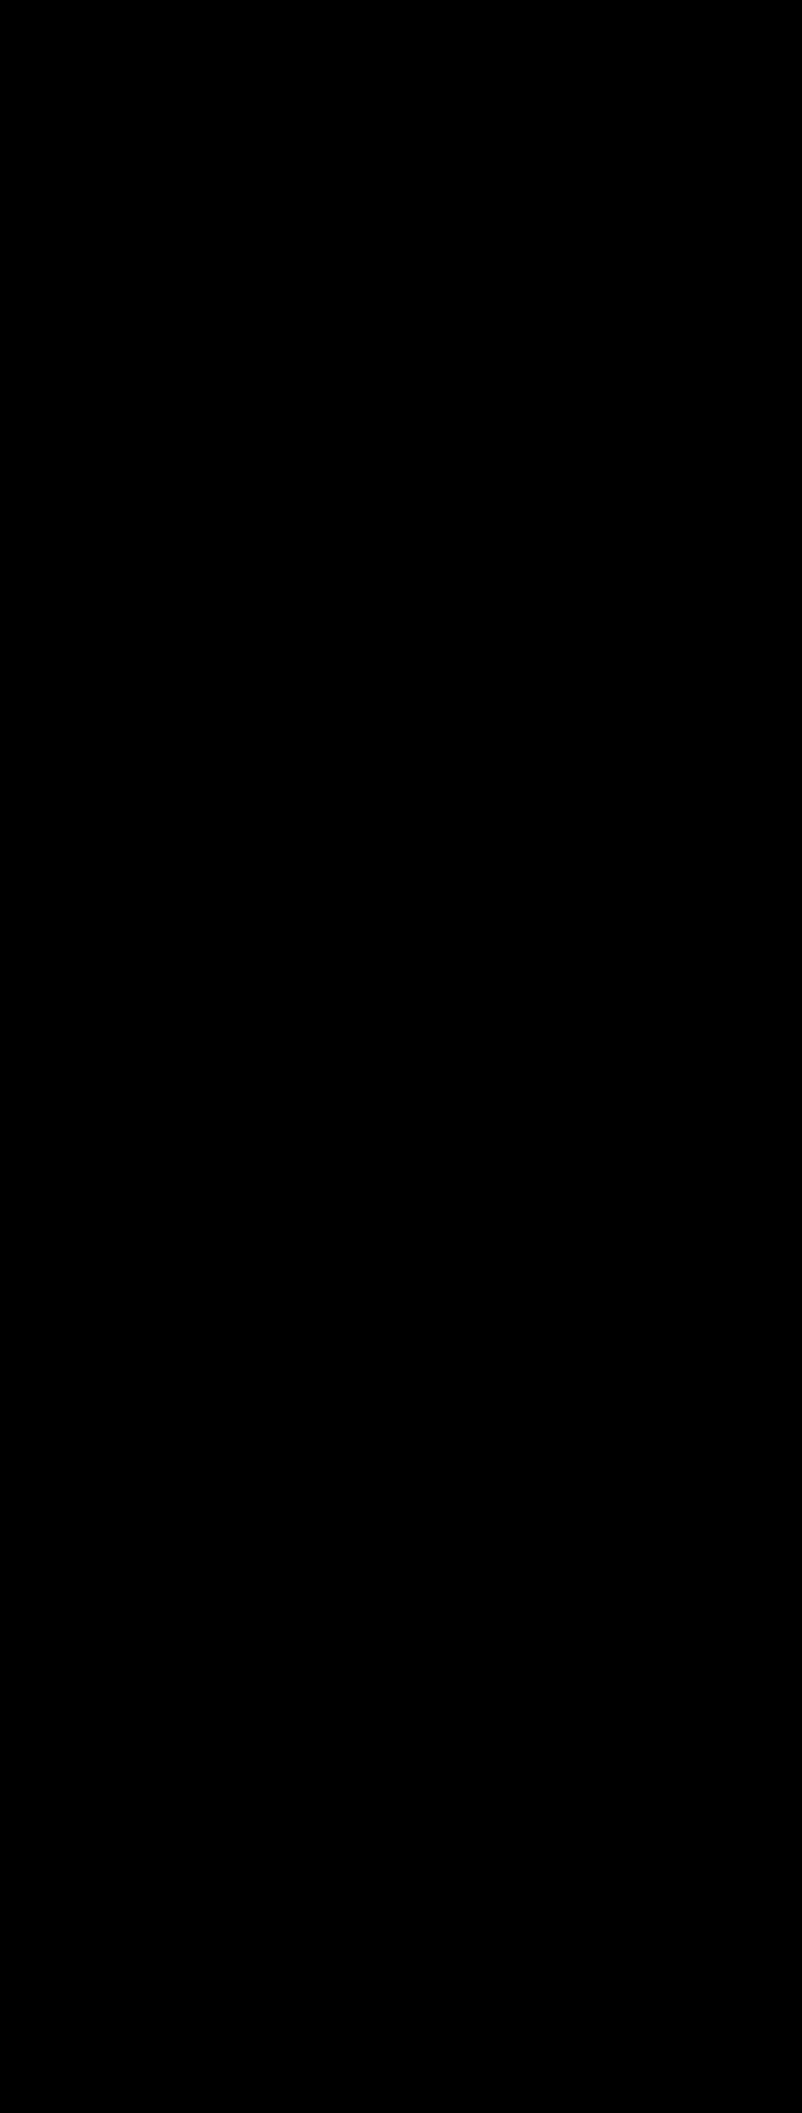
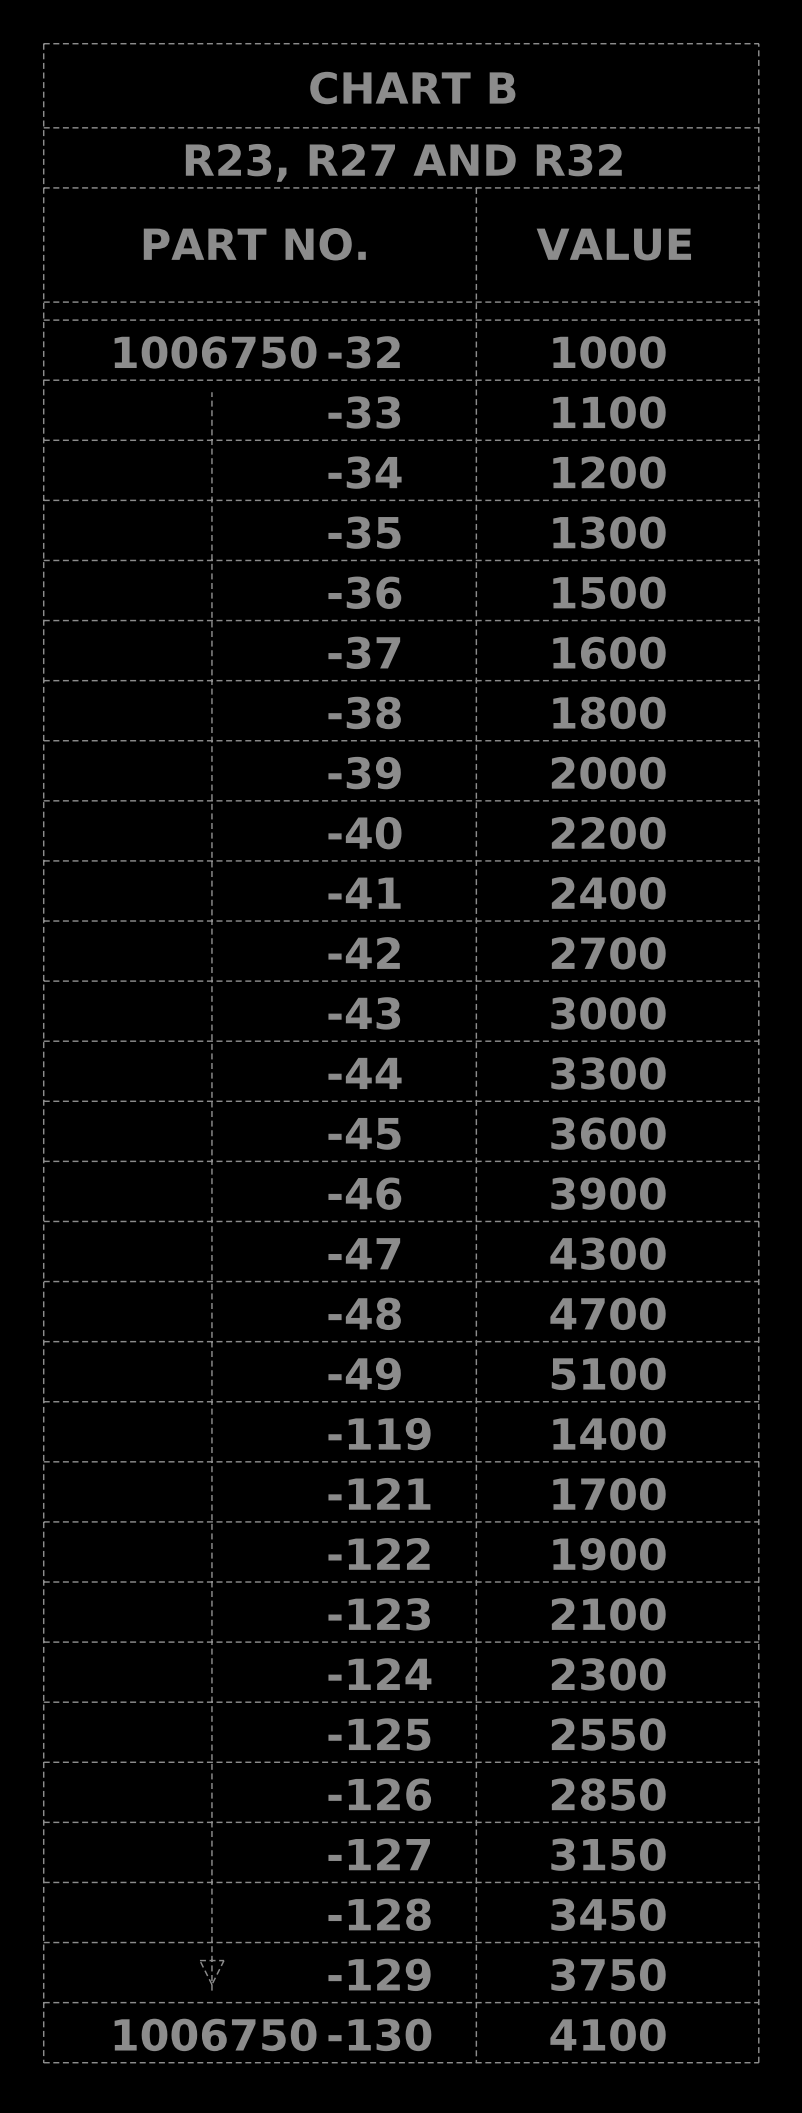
line: none -> (43, 43) (758, 43) (758, 2062) (43, 2062) (43, 43)
text: none -> CHART B (412, 88)
line: none -> (43, 127) (758, 127)
text: none -> R23, R27 AND R32 (403, 162)
line: none -> (43, 187) (758, 187)
line: none -> (476, 187) (476, 2062)
text: none -> PART NO. (254, 244)
text: none -> VALUE (613, 244)
line: none -> (43, 302) (758, 302)
line: none -> (43, 320) (758, 320)
text: none -> 1006750 (215, 352)
text: none -> -32 (364, 352)
text: none -> 1000 (609, 352)
line: none -> (43, 380) (758, 380)
line: none -> (211, 392) (211, 1990)
text: none -> -33 (364, 412)
text: none -> 1100 (609, 412)
line: none -> (43, 440) (758, 440)
text: none -> -34 (365, 472)
text: none -> 1200 (609, 472)
line: none -> (43, 500) (758, 500)
text: none -> -35 (364, 532)
text: none -> 1300 (609, 532)
line: none -> (43, 560) (758, 560)
text: none -> -36 (364, 592)
text: none -> 1500 (609, 592)
line: none -> (43, 620) (758, 620)
text: none -> -37 (364, 652)
text: none -> 1600 (609, 652)
line: none -> (43, 680) (758, 680)
text: none -> -38 (364, 712)
text: none -> 1800 (609, 712)
line: none -> (43, 740) (758, 740)
text: none -> -39 (364, 773)
text: none -> 2000 (608, 773)
line: none -> (43, 800) (758, 800)
text: none -> -40 (364, 833)
text: none -> 2200 (608, 833)
line: none -> (43, 860) (758, 860)
text: none -> -41 (364, 893)
text: none -> 2400 (608, 893)
line: none -> (43, 921) (758, 921)
text: none -> -42 (364, 953)
text: none -> 2700 (608, 953)
line: none -> (43, 981) (758, 981)
text: none -> -43 (364, 1013)
text: none -> 3000 (608, 1013)
line: none -> (43, 1041) (758, 1041)
text: none -> -44 (365, 1073)
text: none -> 3300 (608, 1073)
line: none -> (43, 1101) (758, 1101)
text: none -> -45 (364, 1133)
text: none -> 3600 (608, 1133)
line: none -> (43, 1161) (758, 1161)
text: none -> -46 (364, 1193)
text: none -> 3900 (608, 1193)
line: none -> (43, 1221) (758, 1221)
text: none -> -47 (364, 1253)
text: none -> 4300 (608, 1253)
line: none -> (43, 1281) (758, 1281)
text: none -> -48 (364, 1313)
text: none -> 4700 (608, 1313)
line: none -> (43, 1341) (758, 1341)
text: none -> -49 (364, 1373)
text: none -> 5100 (608, 1373)
line: none -> (43, 1401) (758, 1401)
text: none -> -119 (379, 1434)
text: none -> 1400 (609, 1434)
line: none -> (43, 1461) (758, 1461)
text: none -> -121 (379, 1493)
text: none -> 1700 (609, 1494)
line: none -> (43, 1521) (758, 1521)
text: none -> -122 (379, 1553)
text: none -> 1900 (609, 1554)
line: none -> (43, 1582) (758, 1582)
text: none -> -123 (379, 1614)
text: none -> 2100 (608, 1614)
line: none -> (43, 1642) (758, 1642)
text: none -> -124 (379, 1674)
text: none -> 2300 (608, 1674)
line: none -> (43, 1702) (758, 1702)
text: none -> -125 (379, 1734)
text: none -> 2550 (608, 1734)
line: none -> (43, 1762) (758, 1762)
text: none -> -126 (379, 1794)
text: none -> 2850 (608, 1794)
line: none -> (43, 1822) (758, 1822)
text: none -> -127 (379, 1854)
text: none -> 3150 (608, 1854)
line: none -> (43, 1882) (758, 1882)
text: none -> -128 (379, 1914)
text: none -> 3450 (608, 1914)
line: none -> (43, 1942) (758, 1942)
line: none -> (199, 1960) (211, 1984) (223, 1960) (199, 1960)
text: none -> -129 (379, 1974)
text: none -> 3750 (608, 1974)
line: none -> (43, 2002) (758, 2002)
text: none -> 1006750 (215, 2034)
text: none -> -130 (379, 2034)
text: none -> 4100 (608, 2034)

